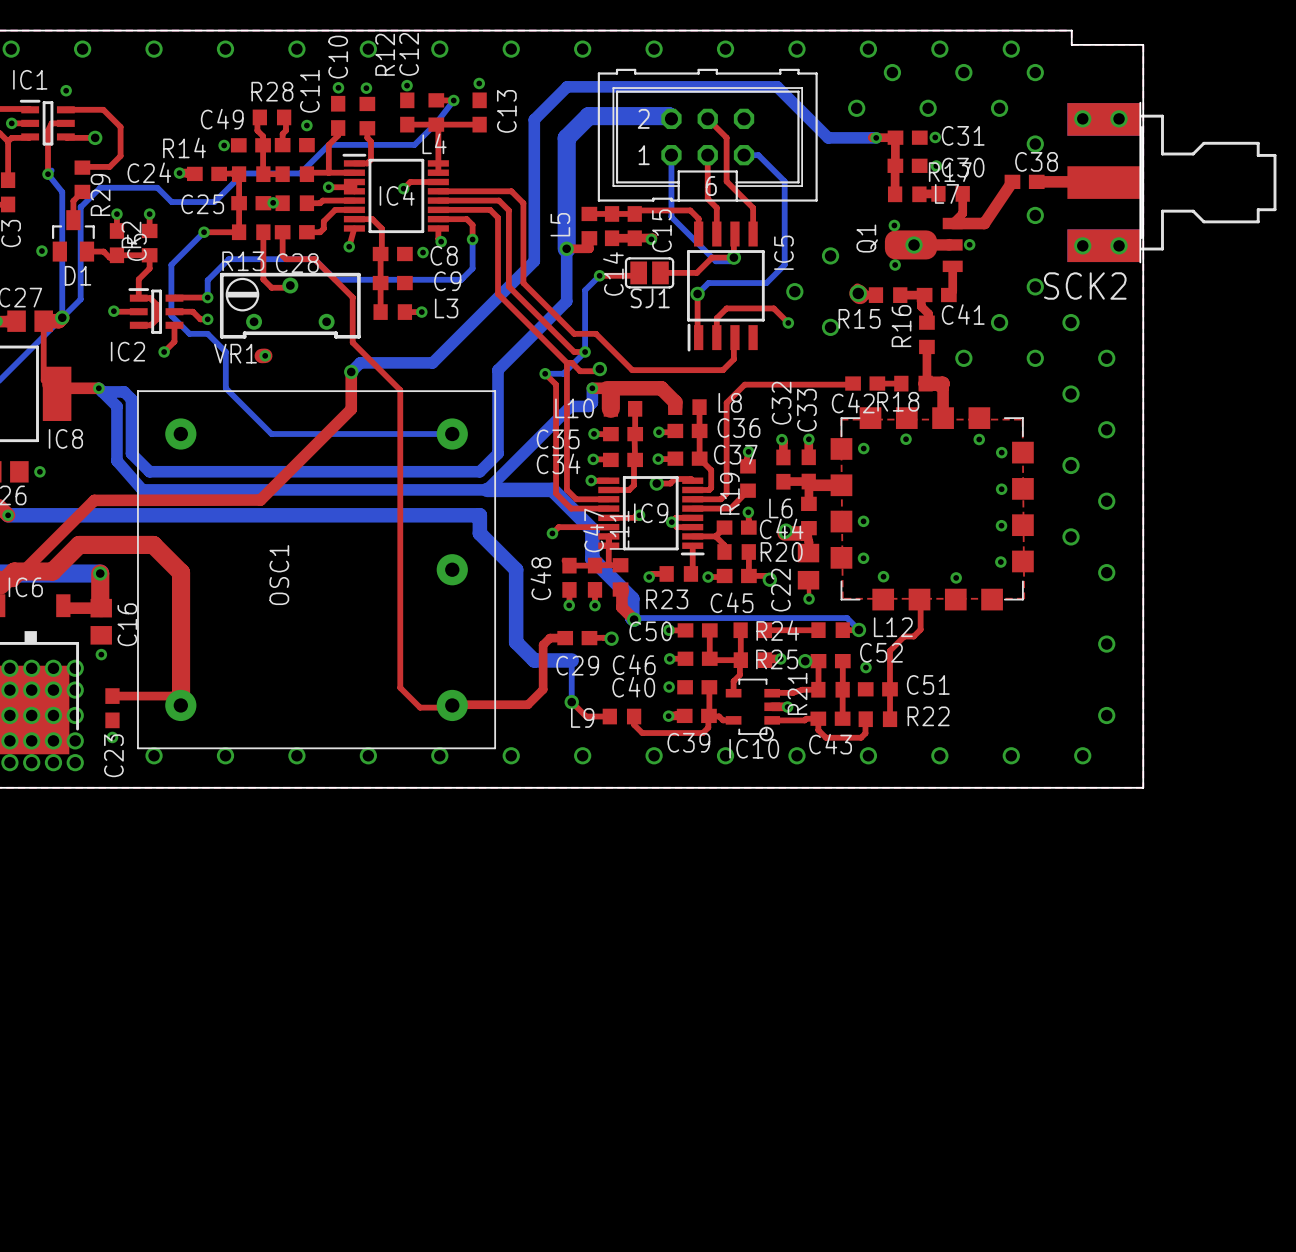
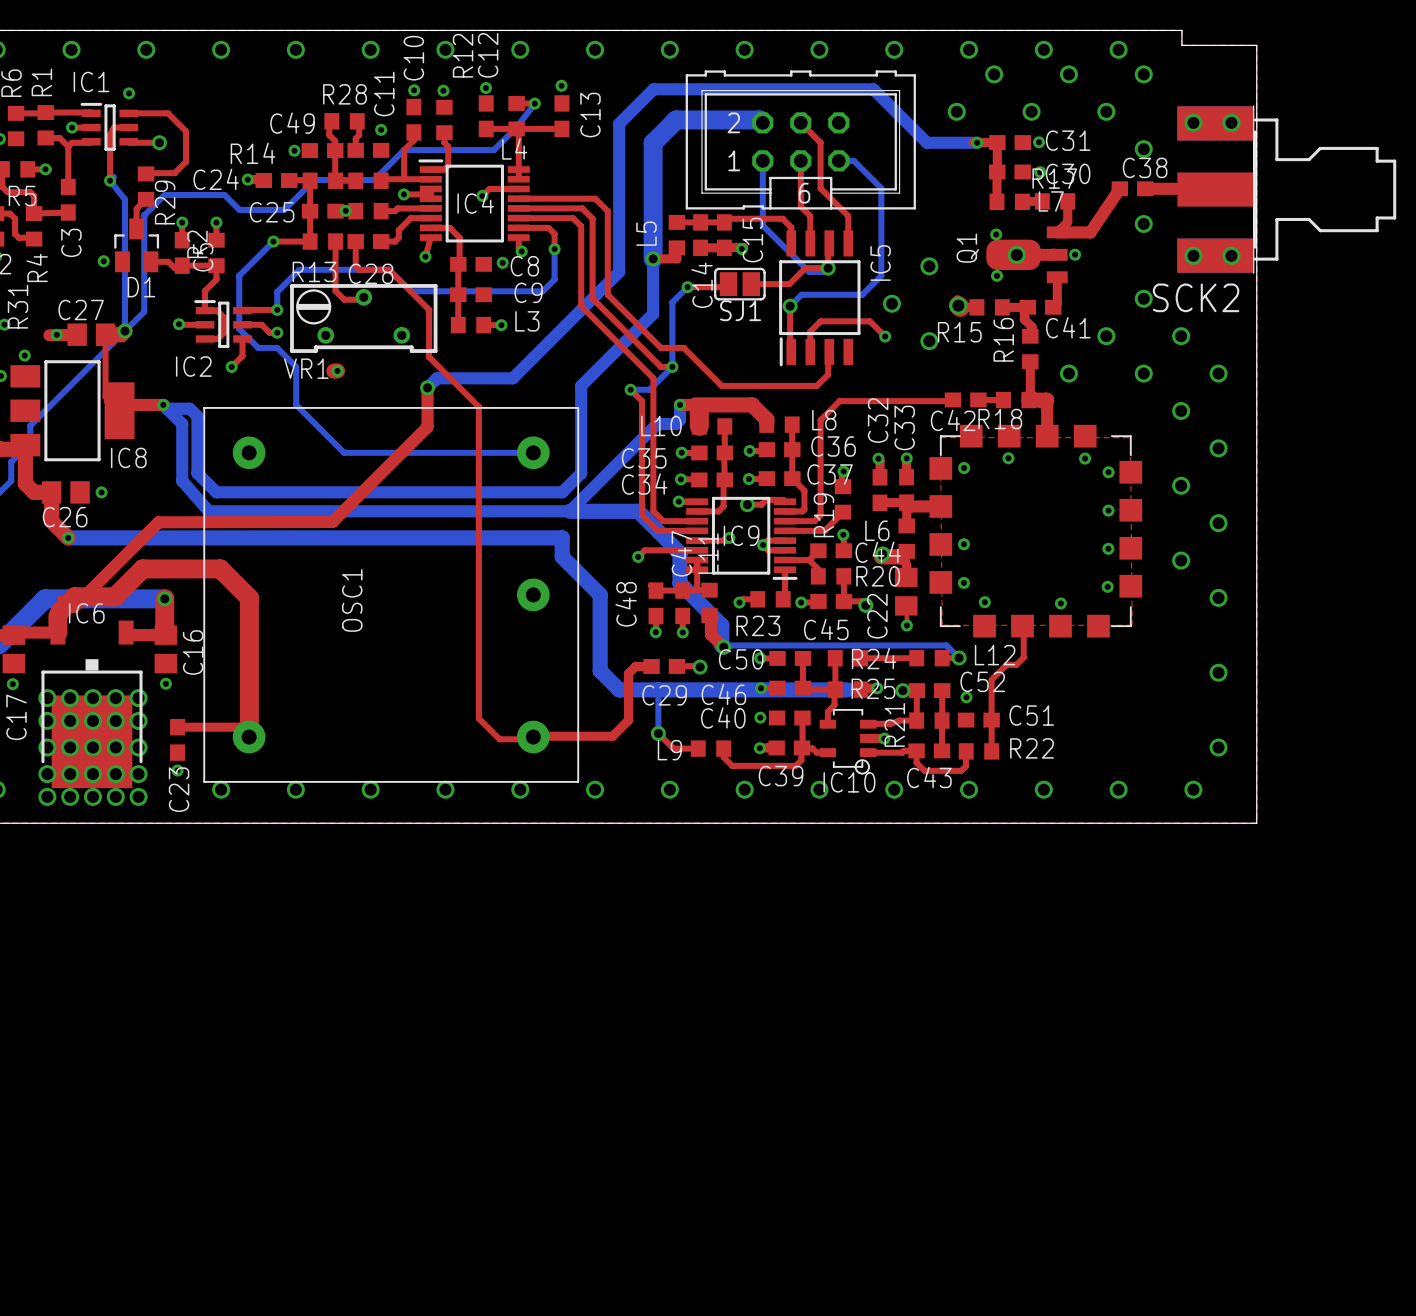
top track: (566, 362) (571, 362) (580, 371) (597, 371) (599, 369) -> none
via: (599, 369) -> none
bottom track: none -> (658, 689) (847, 689)

